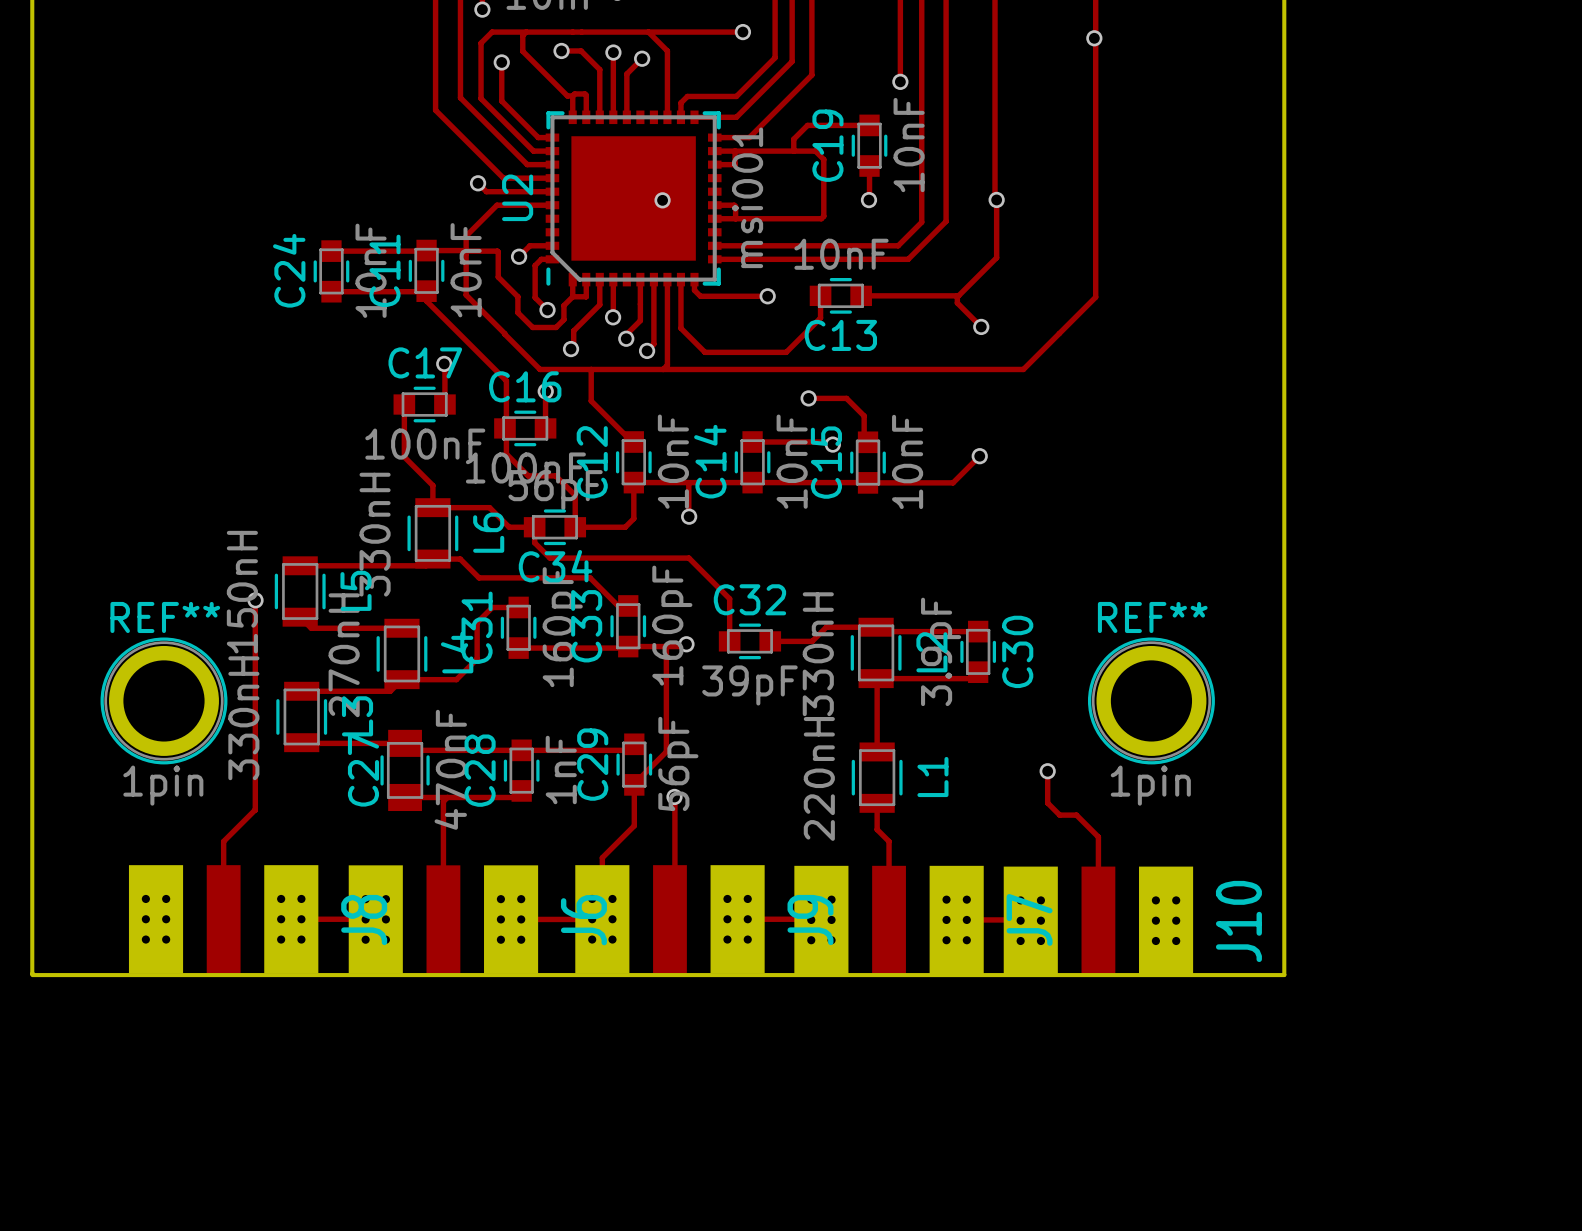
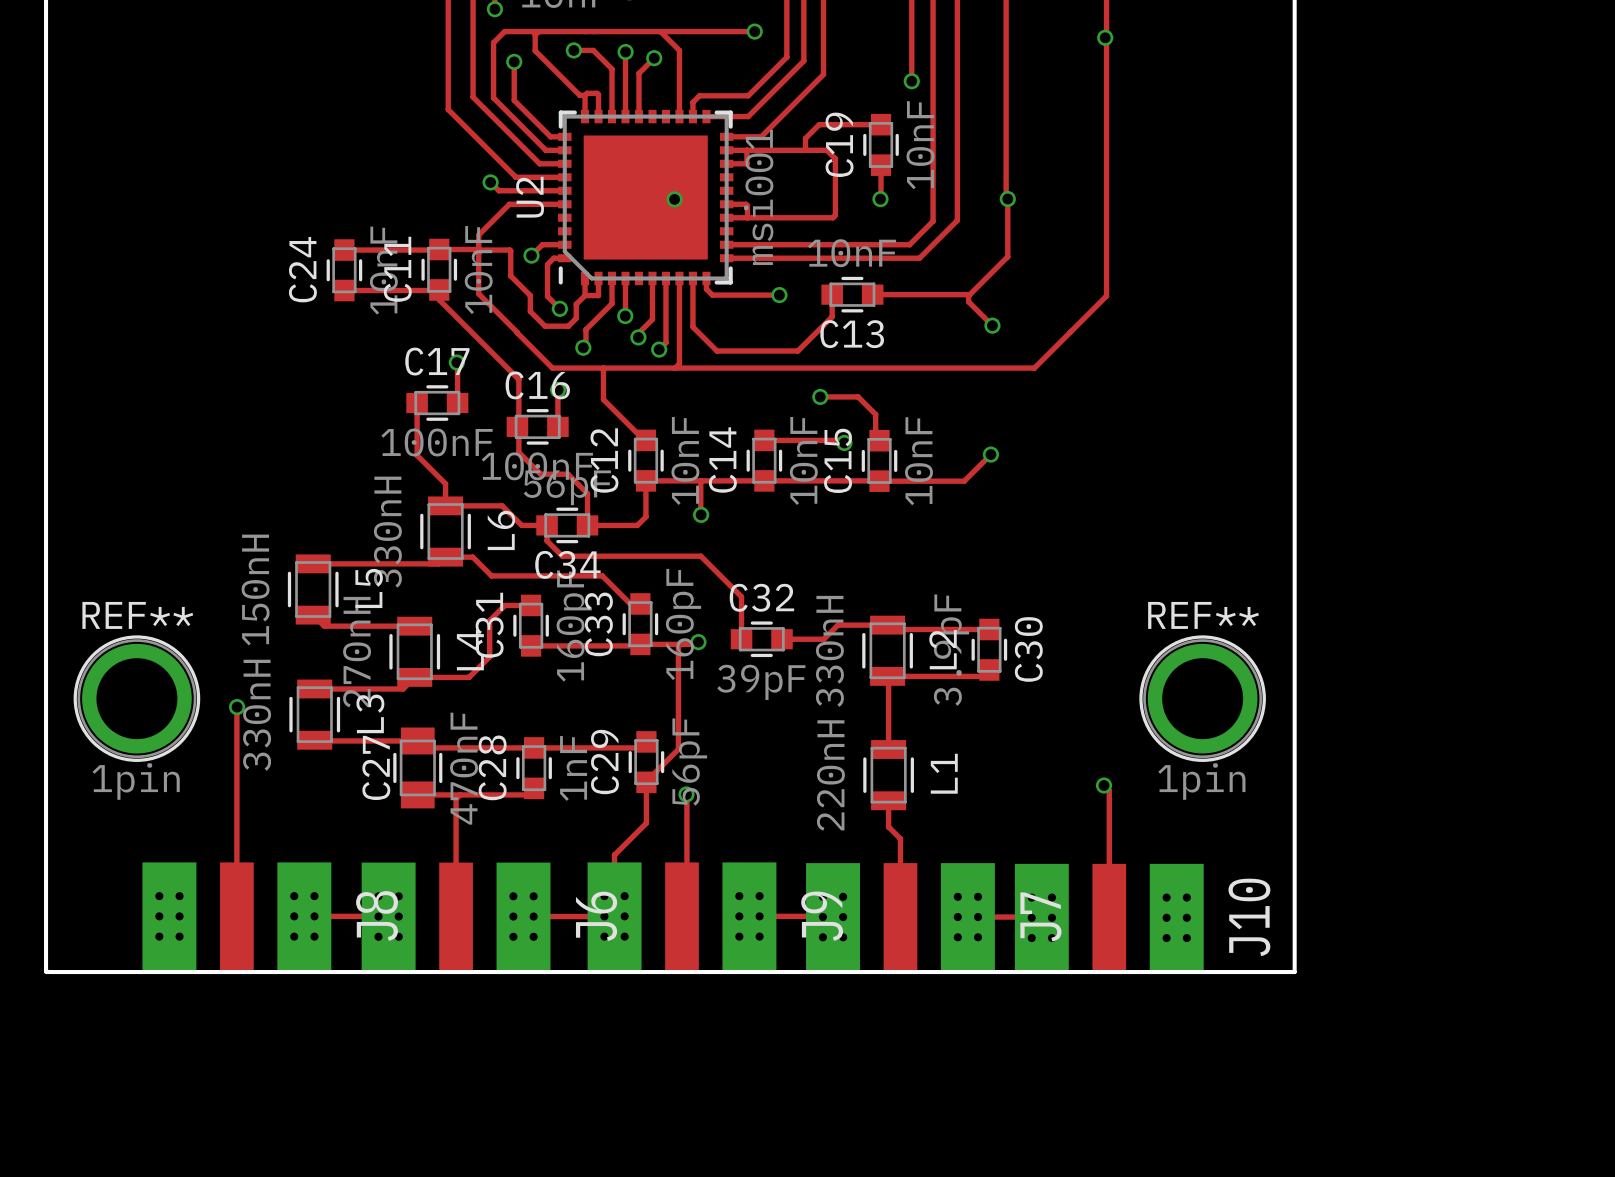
track: (255, 600) (255, 810) -> none
via position: (255, 600) -> (237, 707)
REF** position: (163, 700) -> (136, 698)
REF** position: (1151, 700) -> (1202, 698)
track: (1047, 771) (1047, 803) (1059, 815) (1076, 815) (1098, 837) -> (1104, 785) (1109, 790) (1109, 834)
via position: (1047, 771) -> (1104, 785)
track: (254, 810) (223, 841) -> (236, 707) (236, 838)

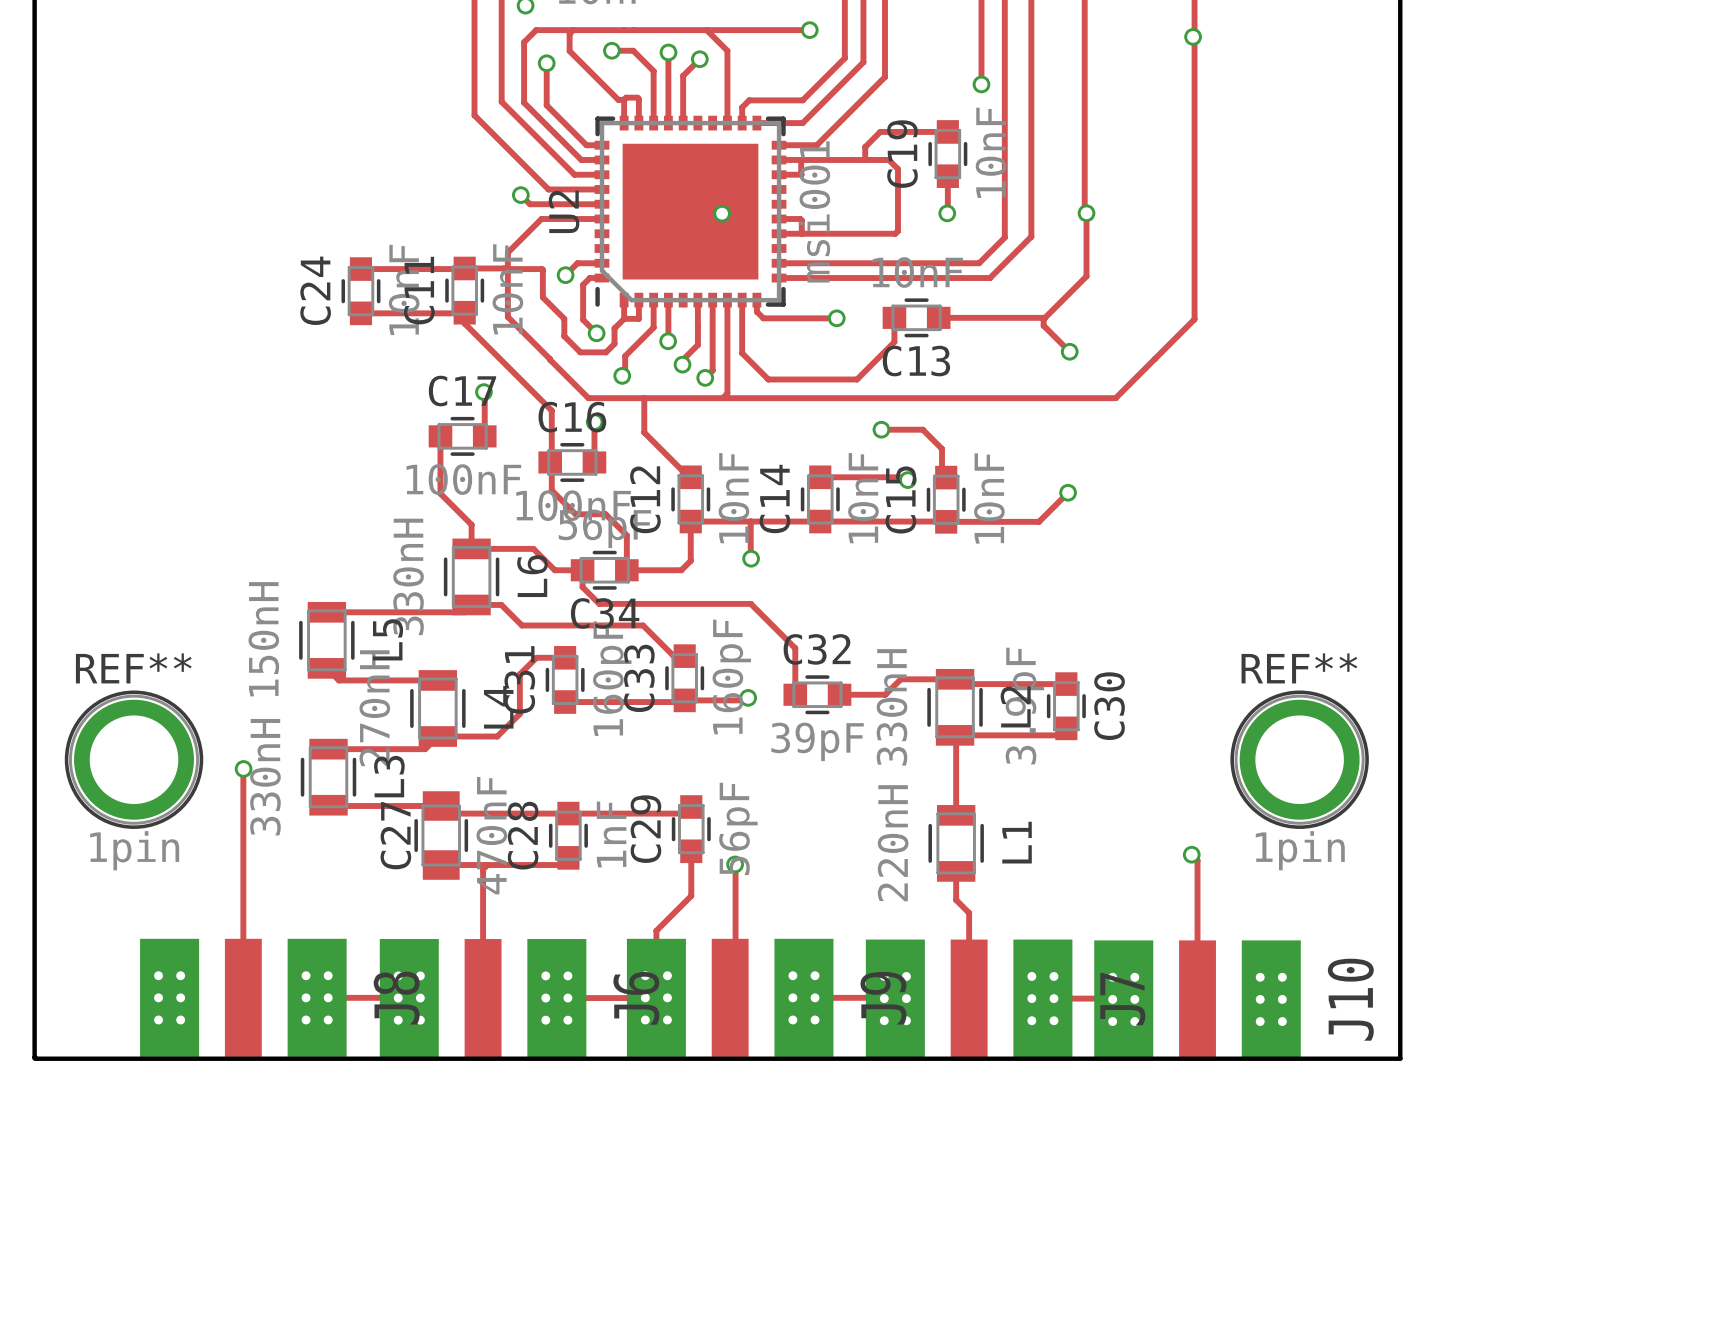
track: (678, 644) (678, 749) (646, 782) -> none

